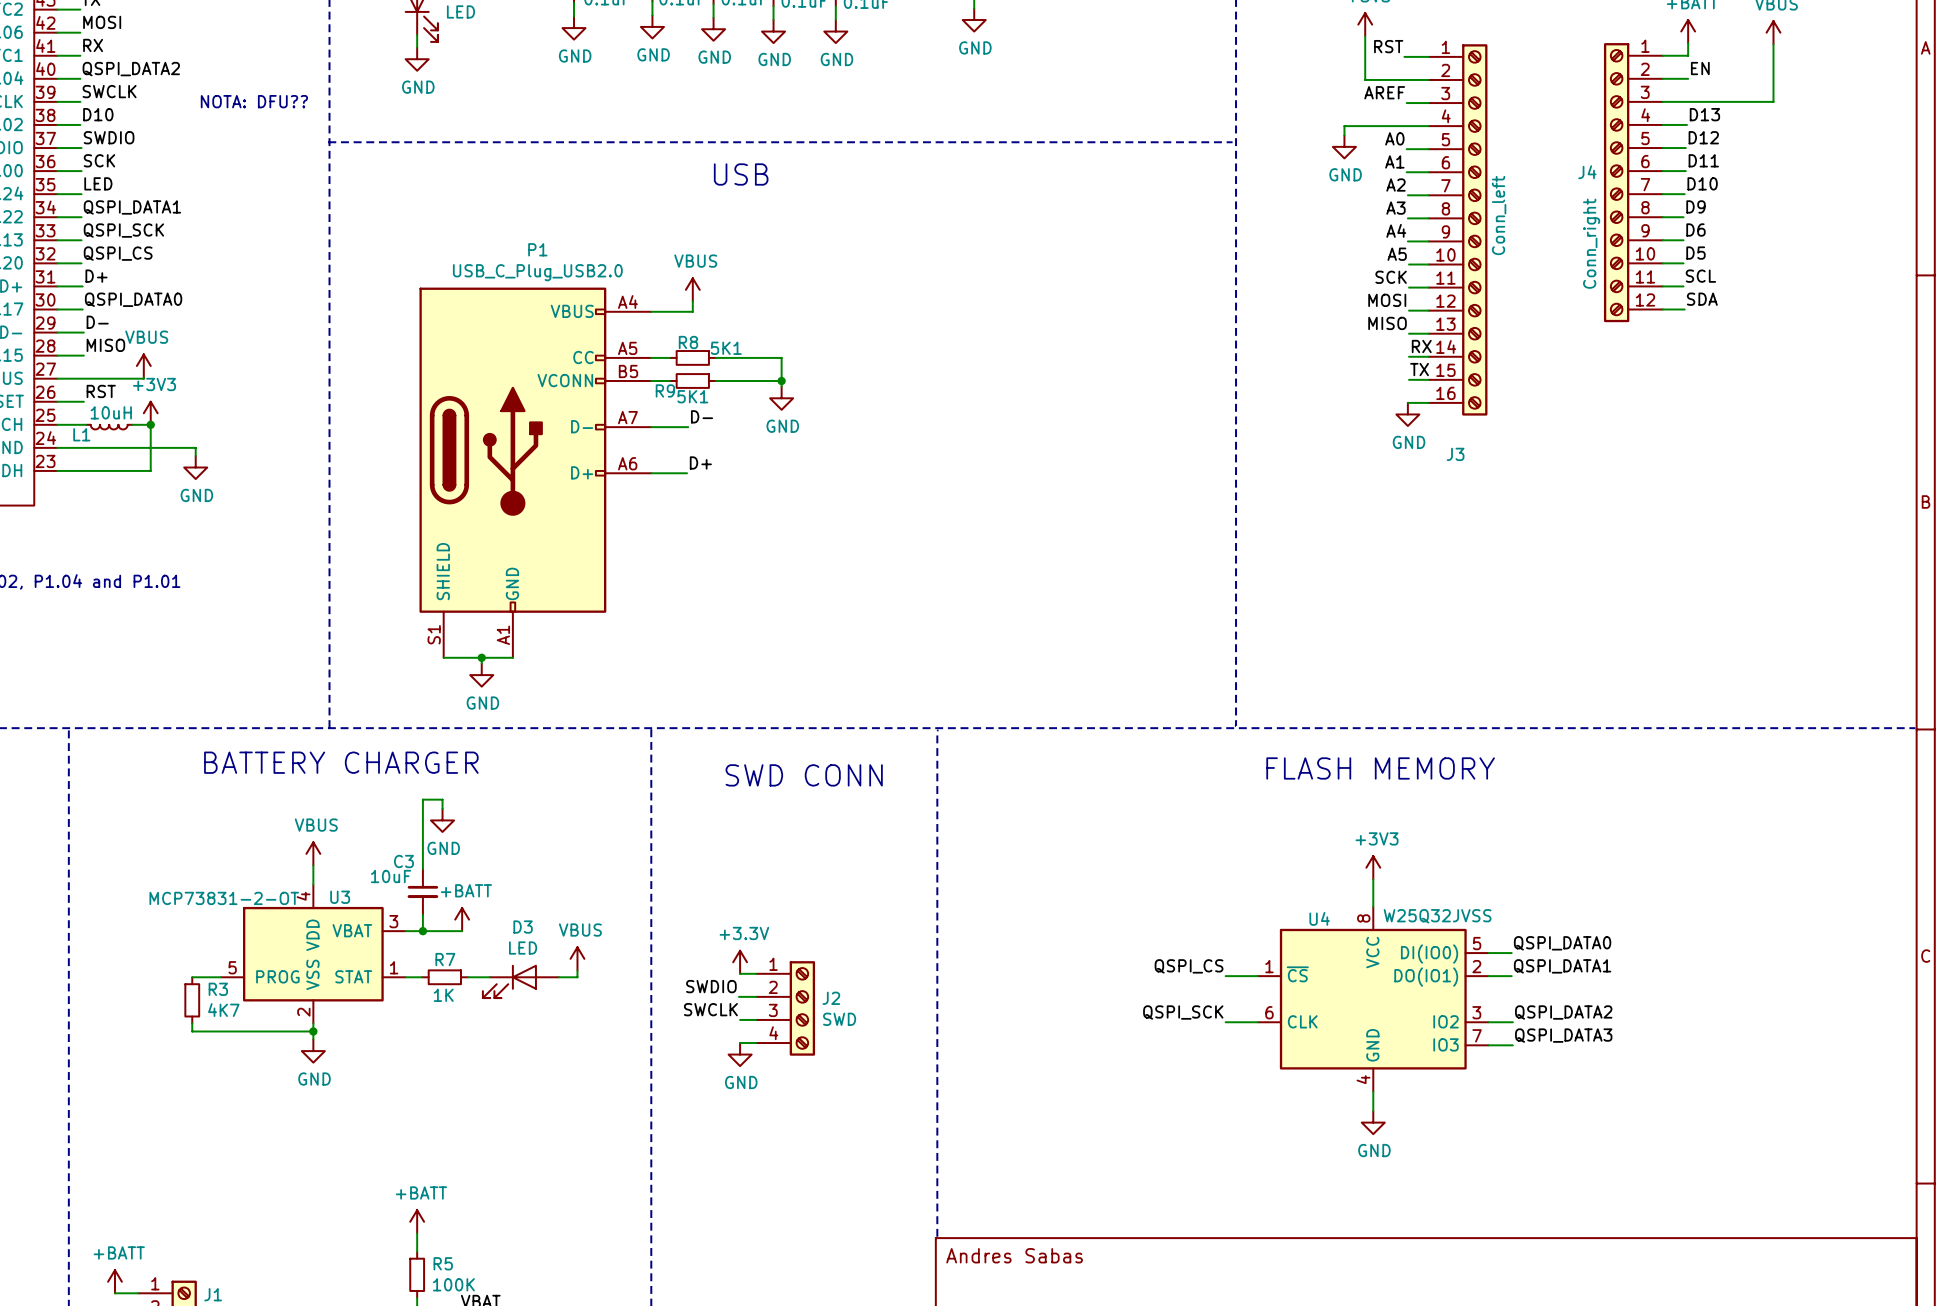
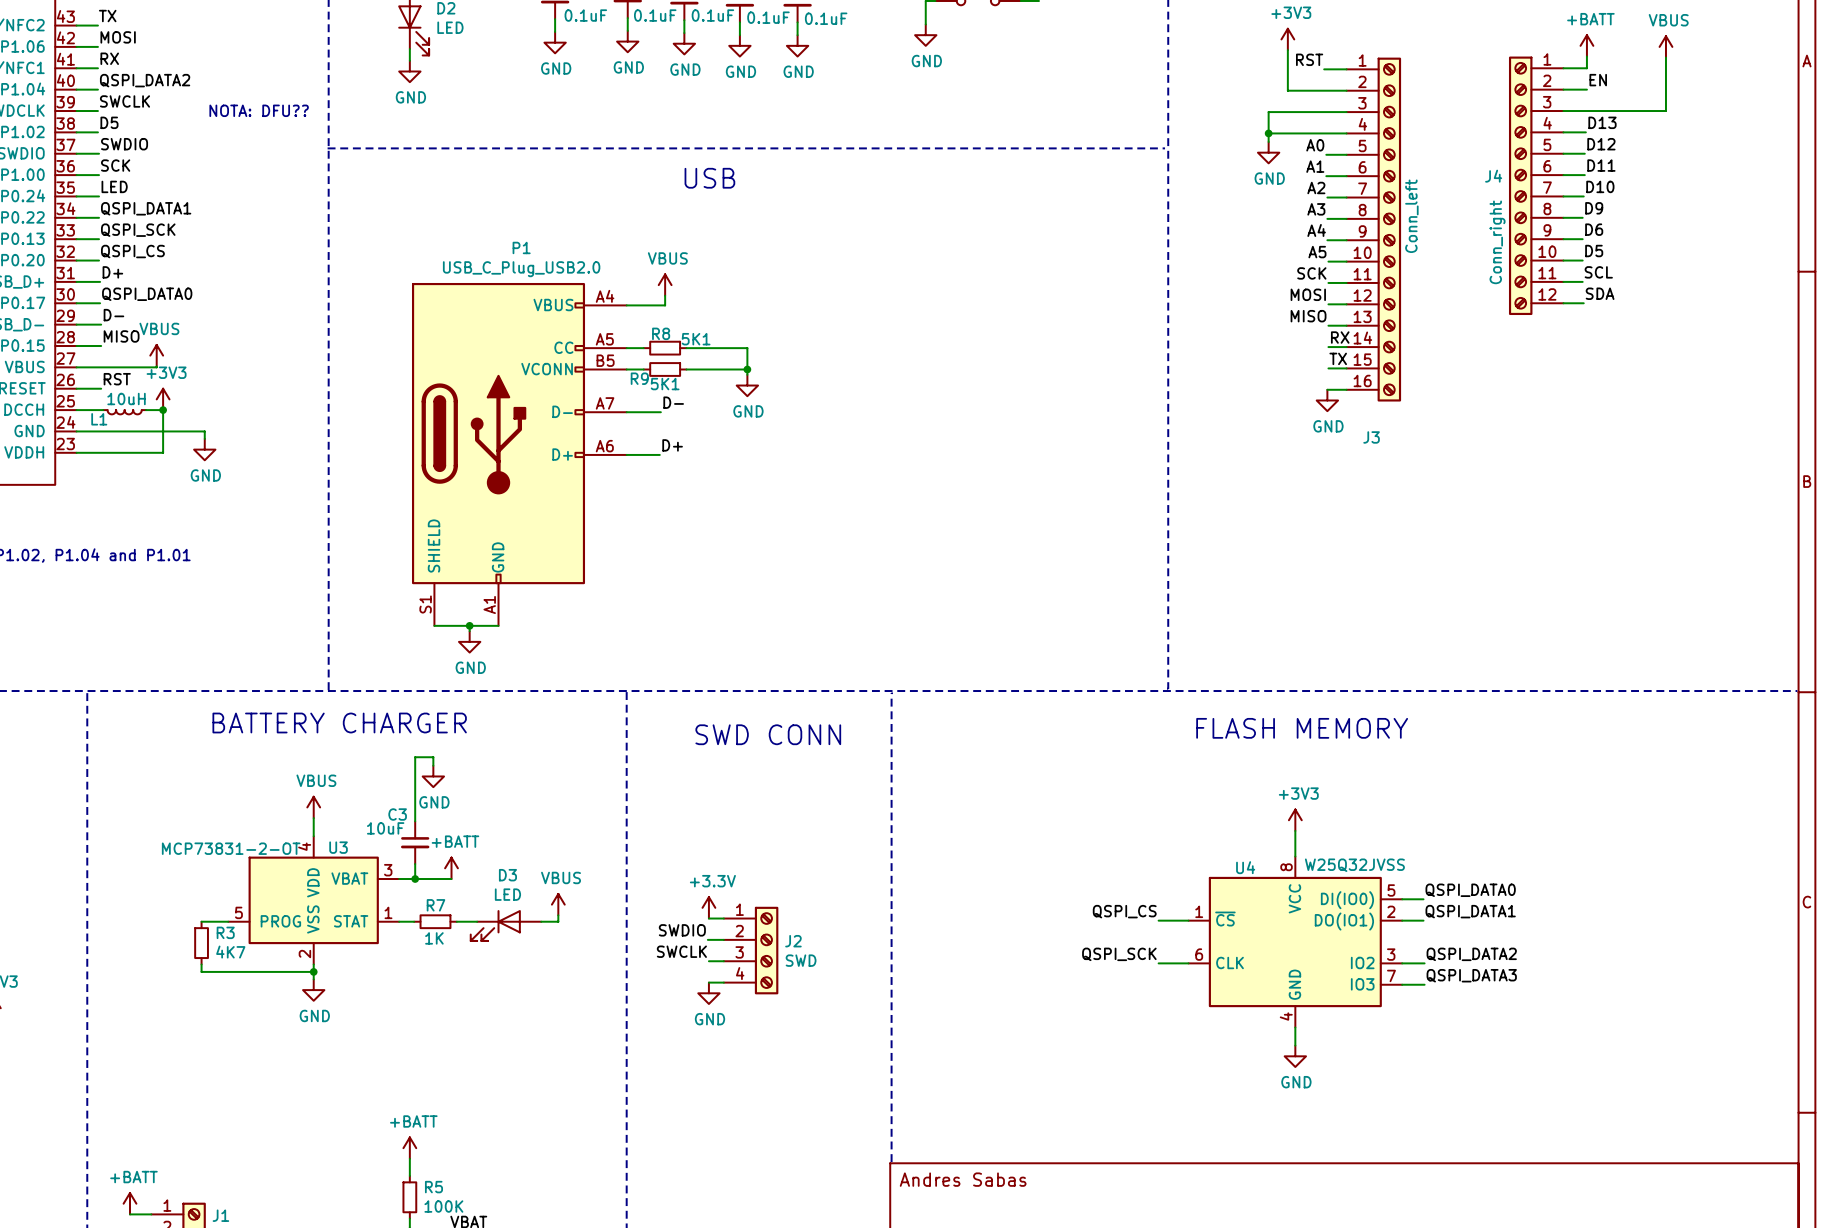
label: AREF (1384, 92) -> none
wire: none -> (1326, 112) (1268, 112) (1268, 133)
label: D10 (98, 114) -> D5 (109, 122)
junction: none -> (1268, 133)

